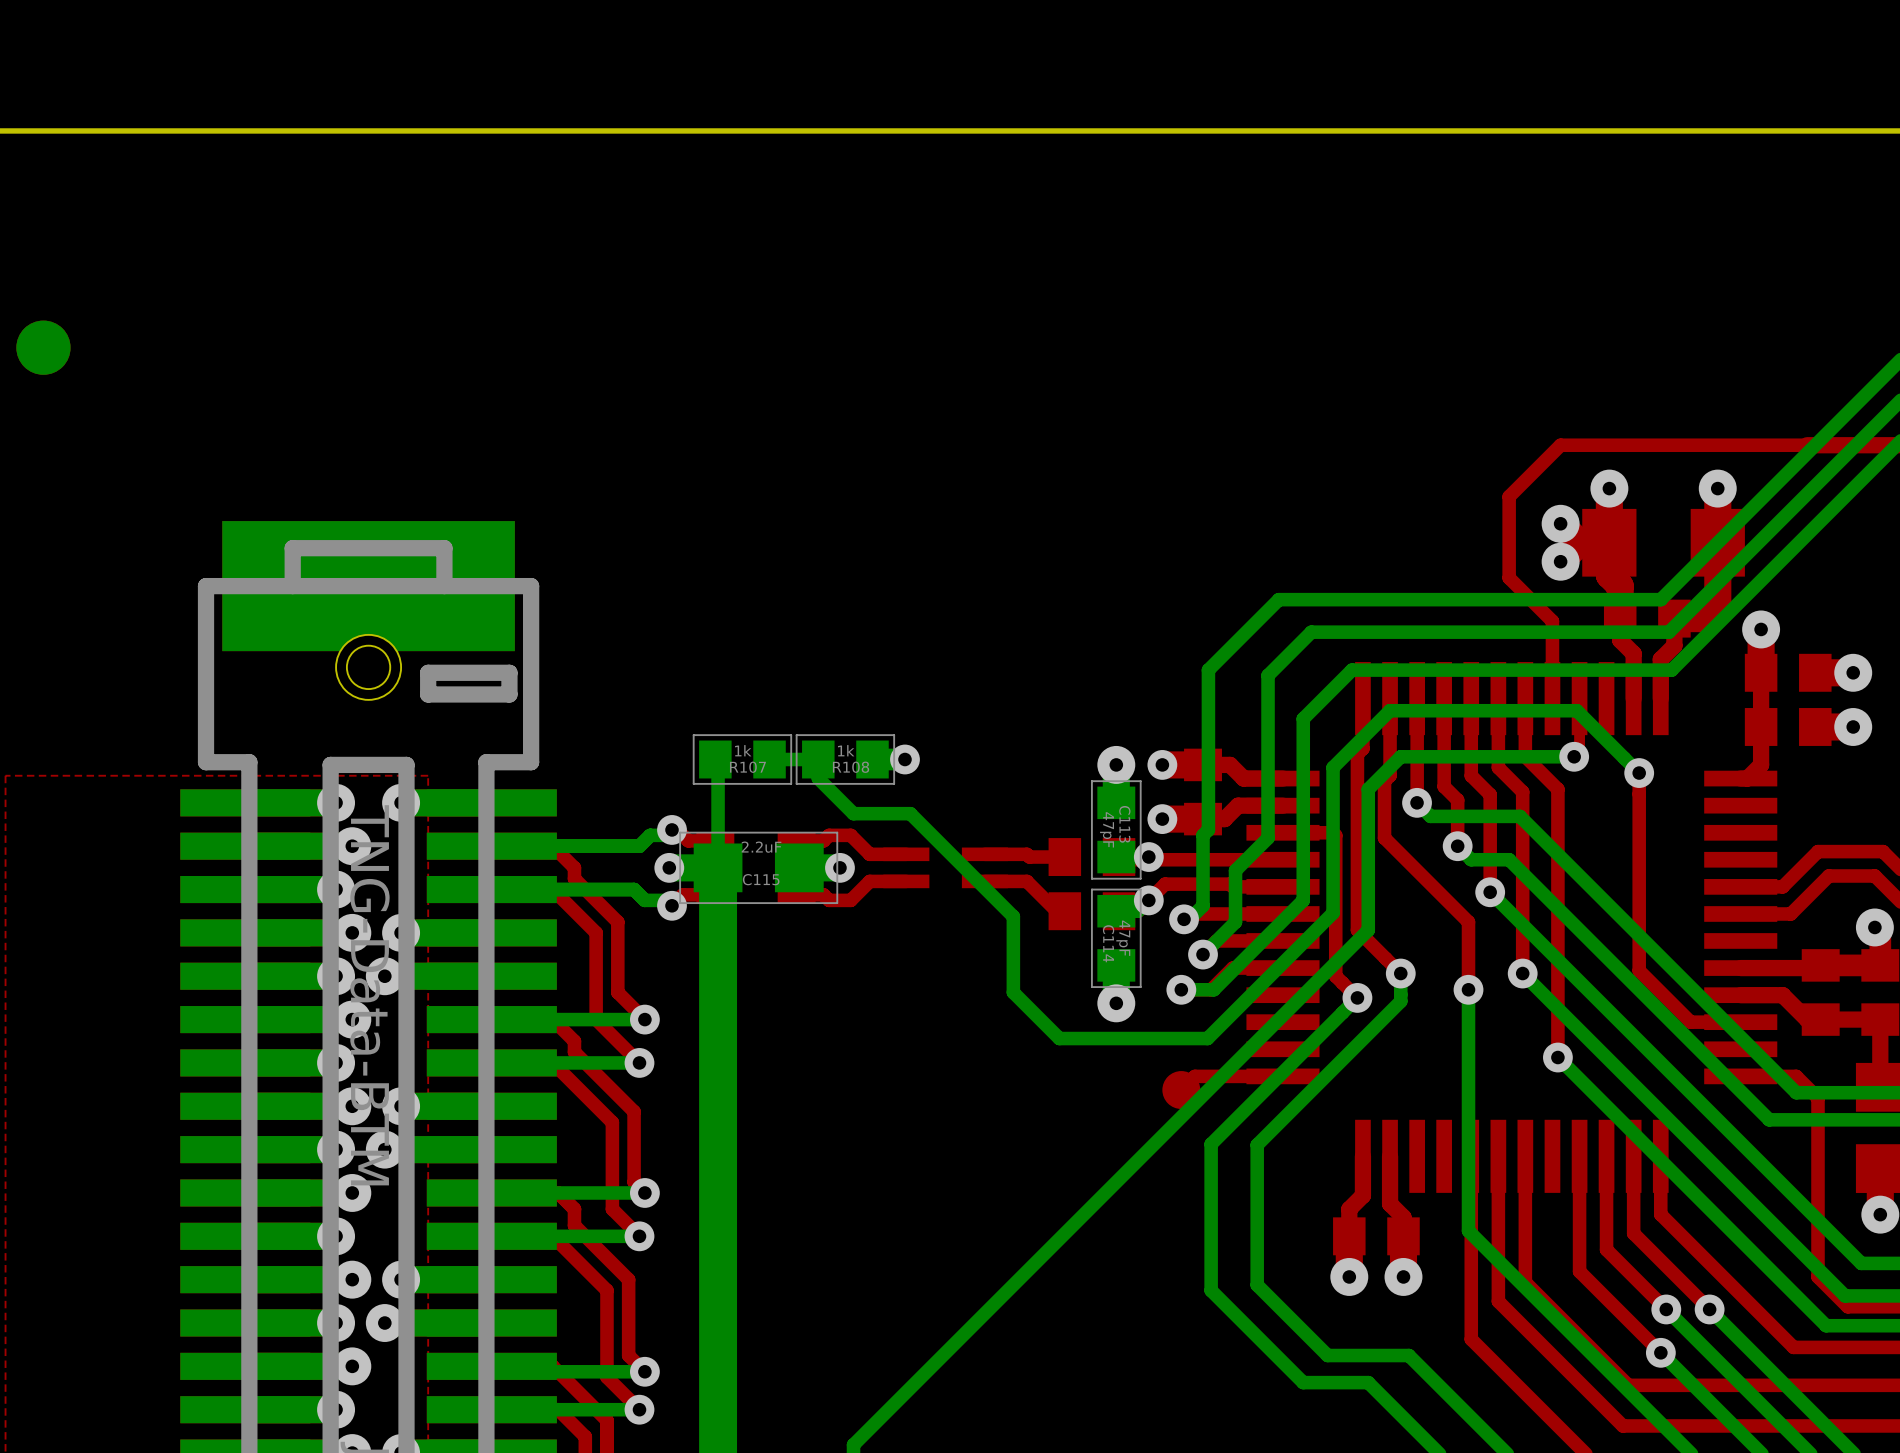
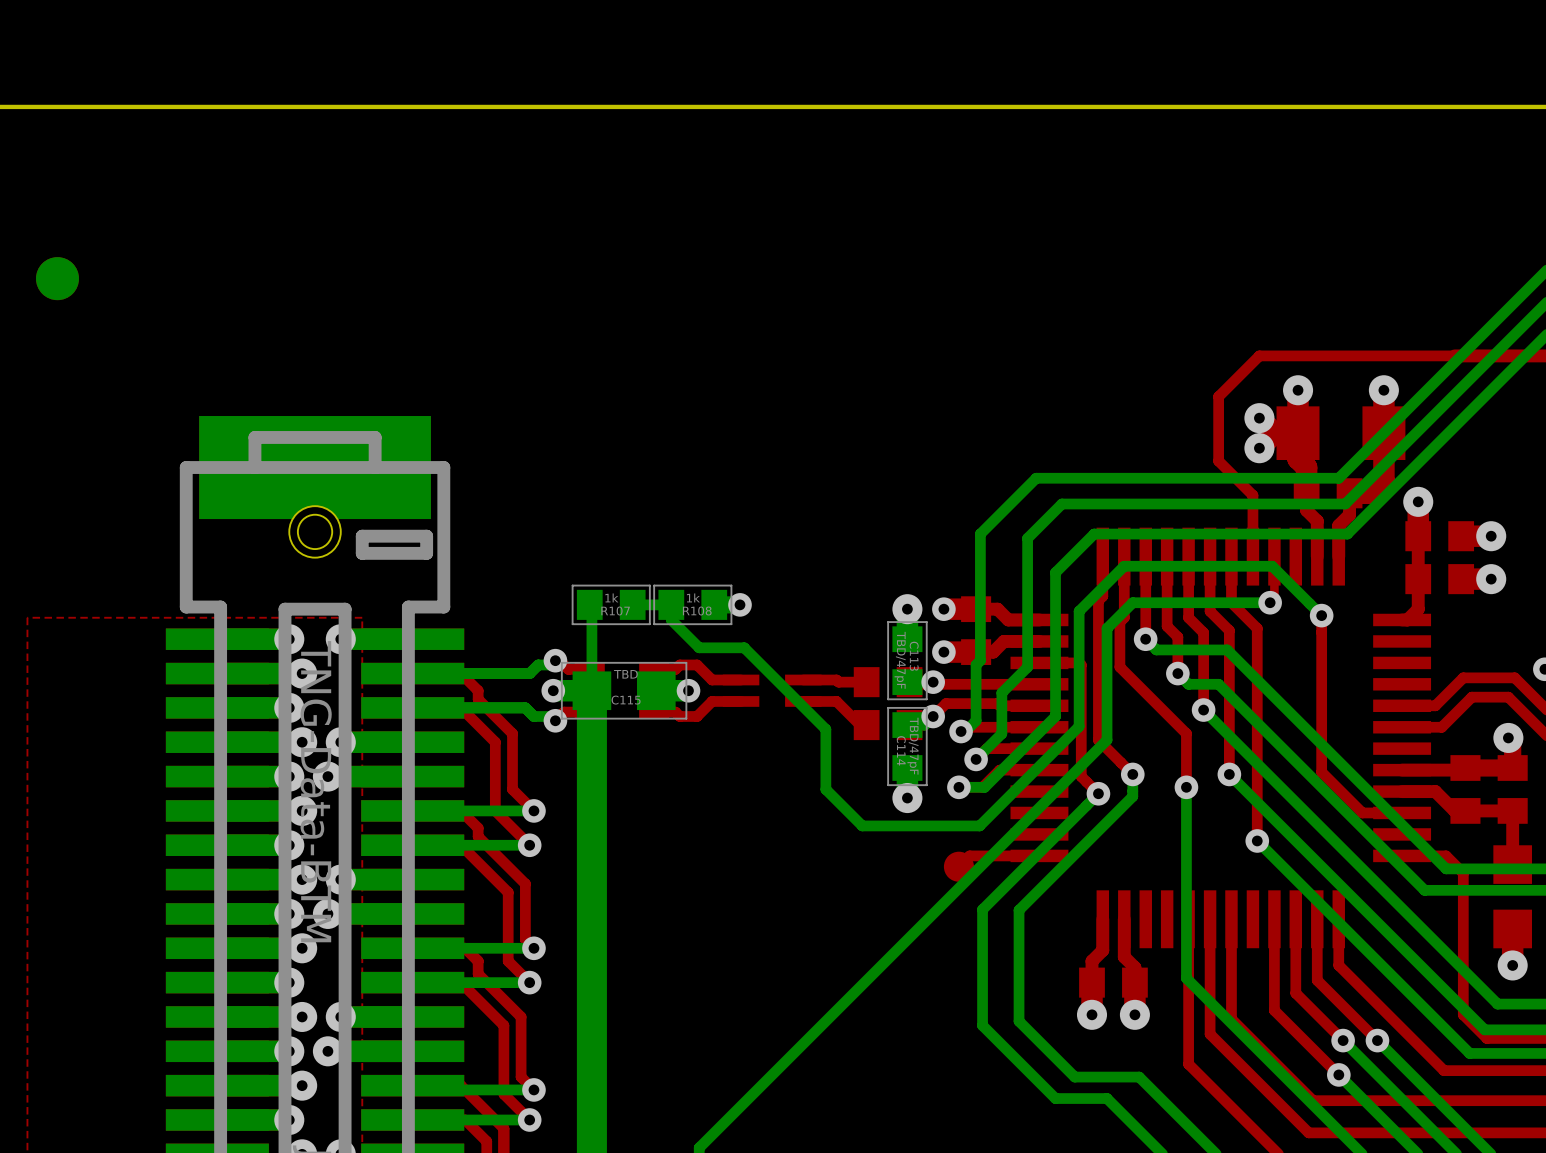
C113 value: 47pF (1107, 829) -> TBD/47pF (900, 660)
C115 value: 2.2uF (761, 847) -> TBD (625, 674)
C114 value: 47pF (1123, 938) -> TBD/47pF (912, 746)

